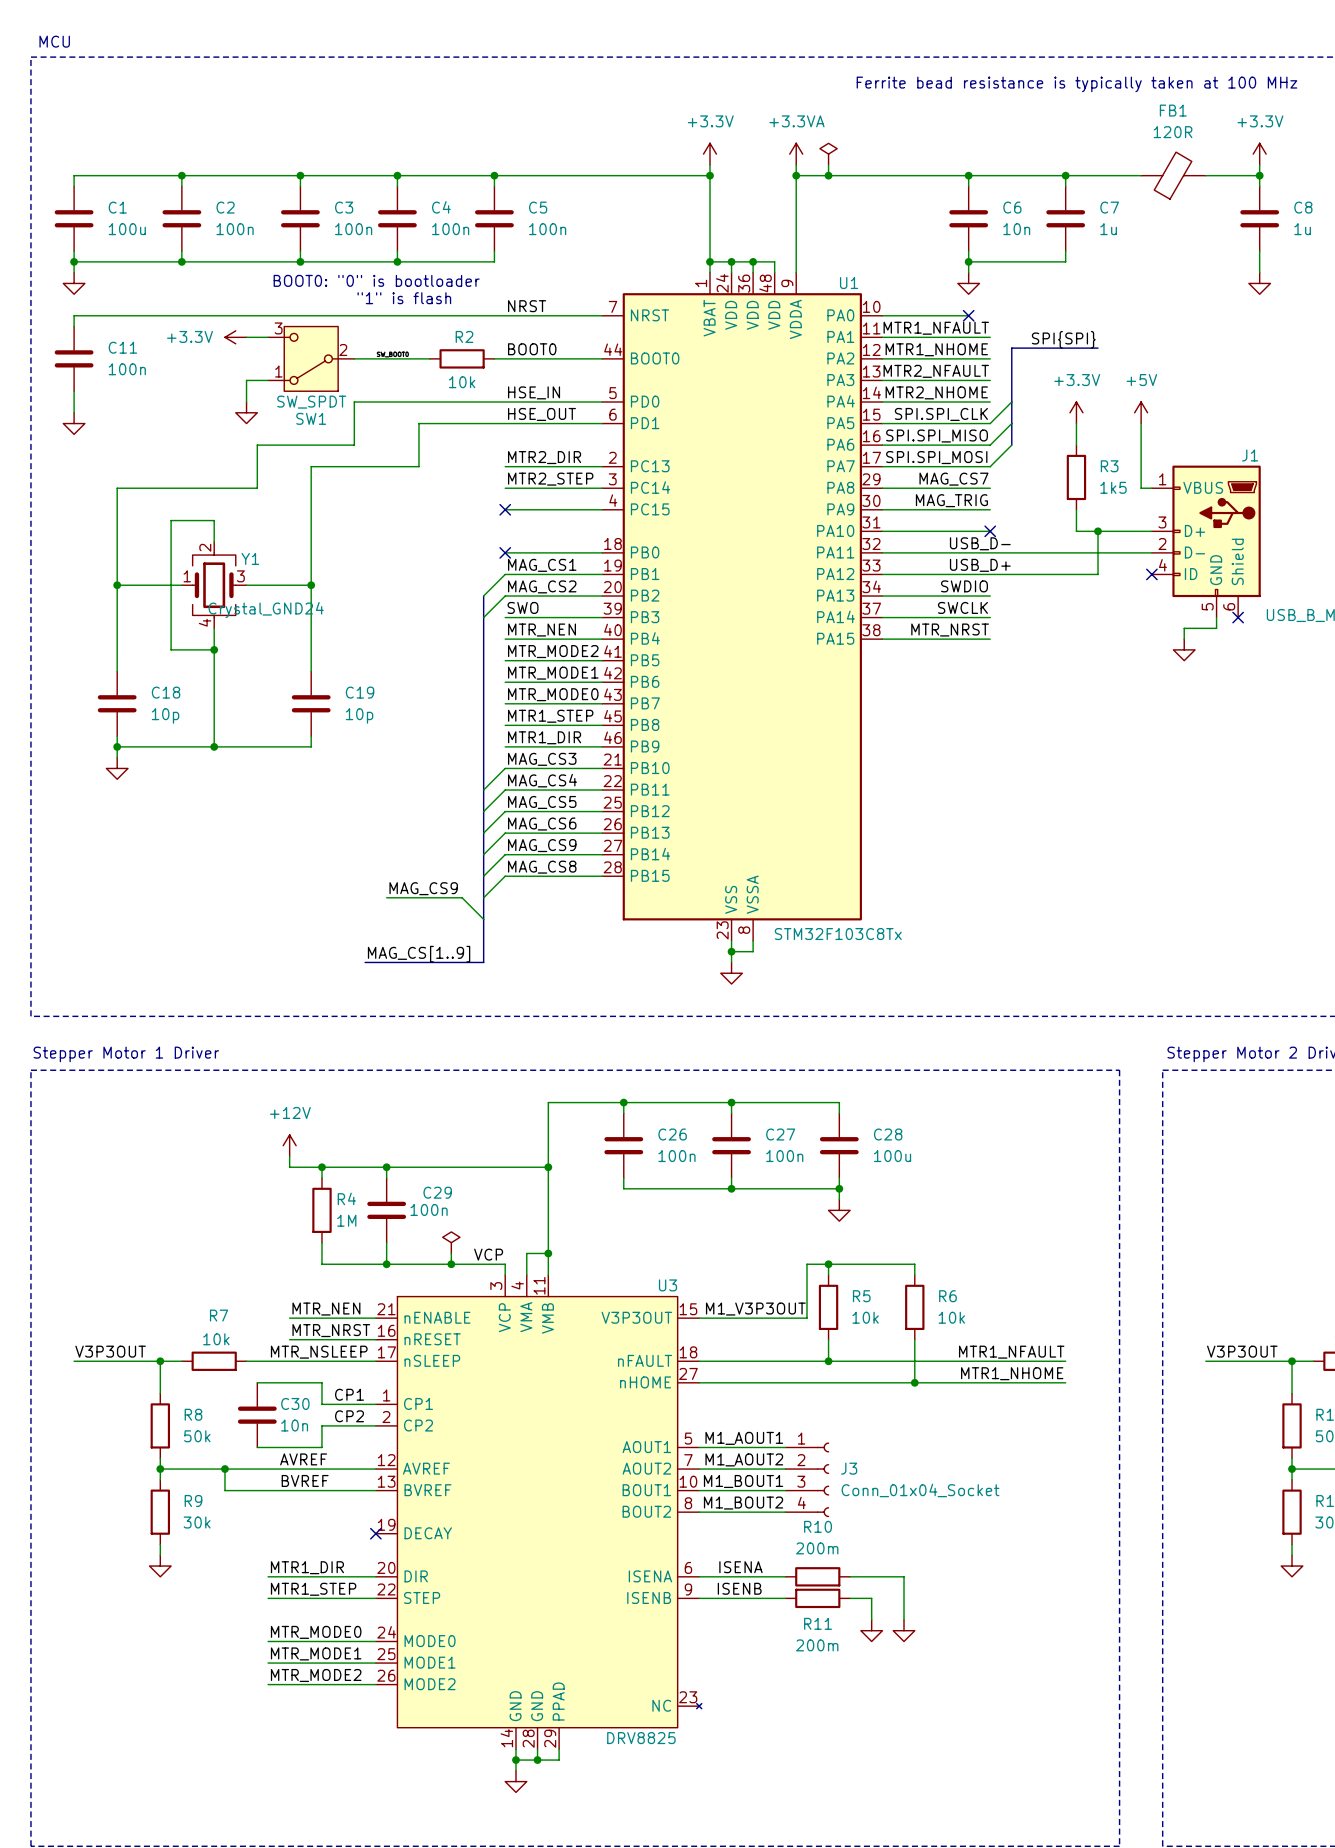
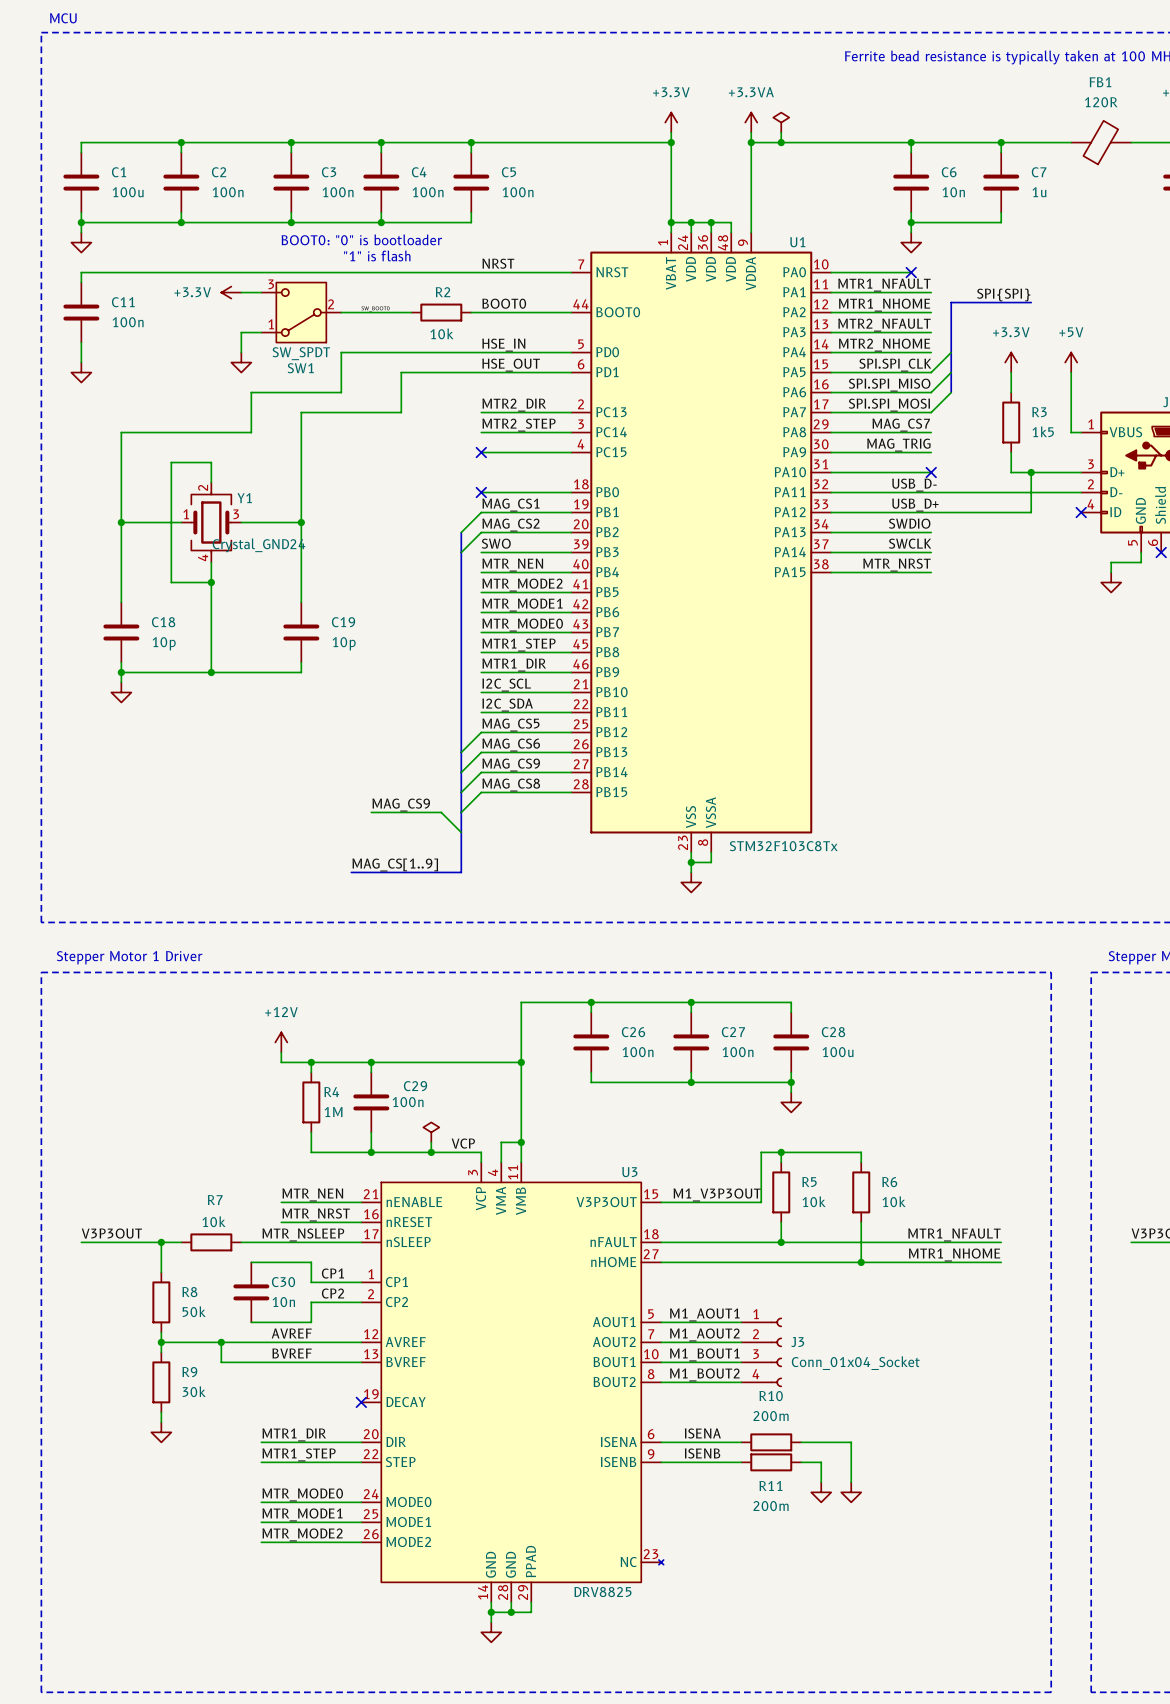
label: MAG_CS3 (542, 759) -> I2C_SCL (506, 685)
wire: (505, 768) (483, 790) -> none
label: MAG_CS4 (542, 780) -> I2C_SDA (507, 705)
wire: (505, 790) (483, 811) -> none

